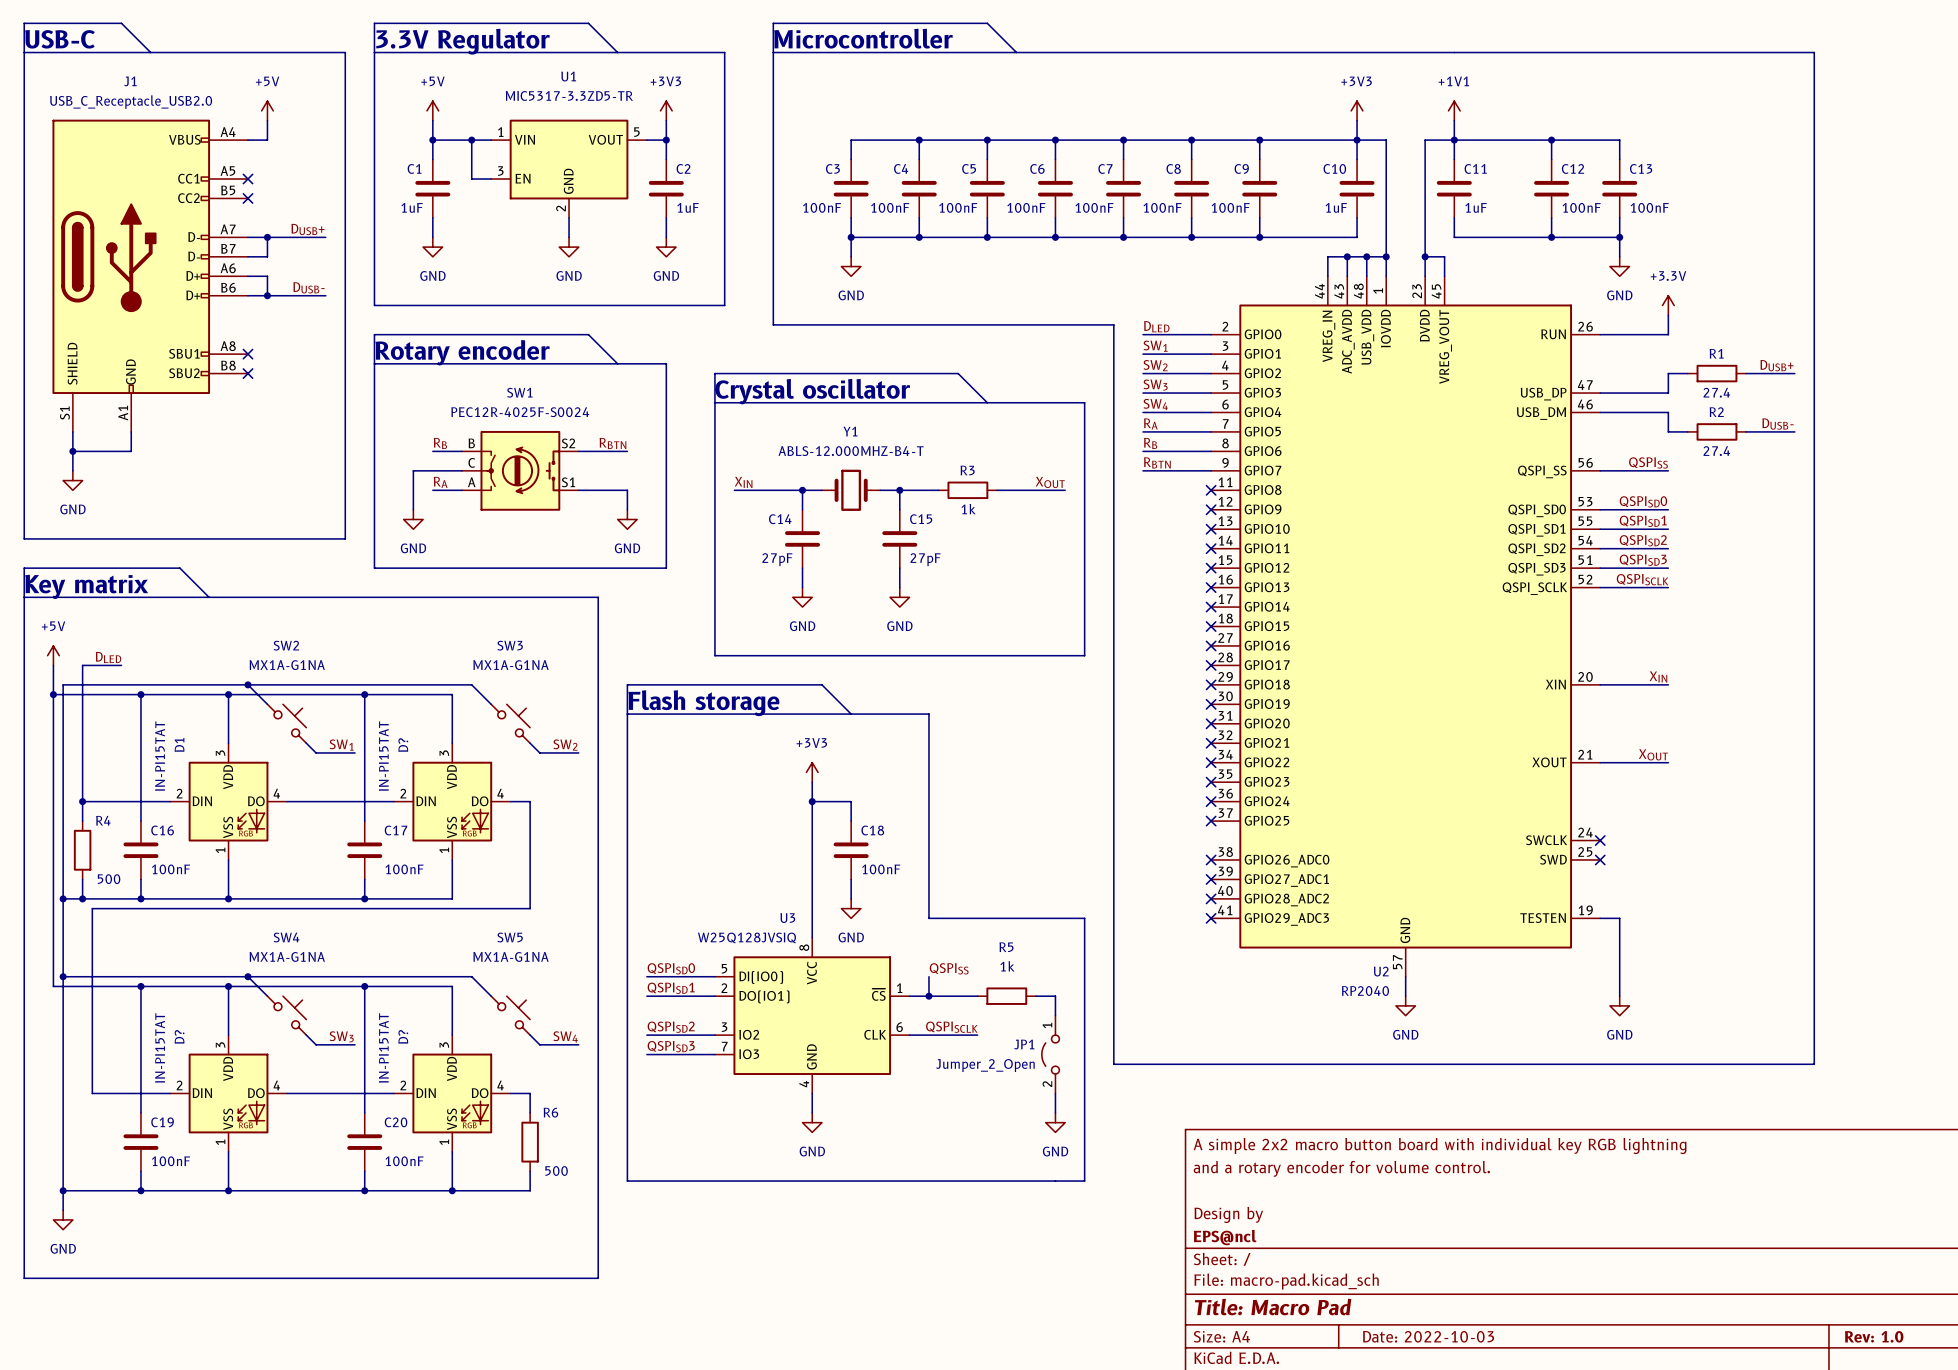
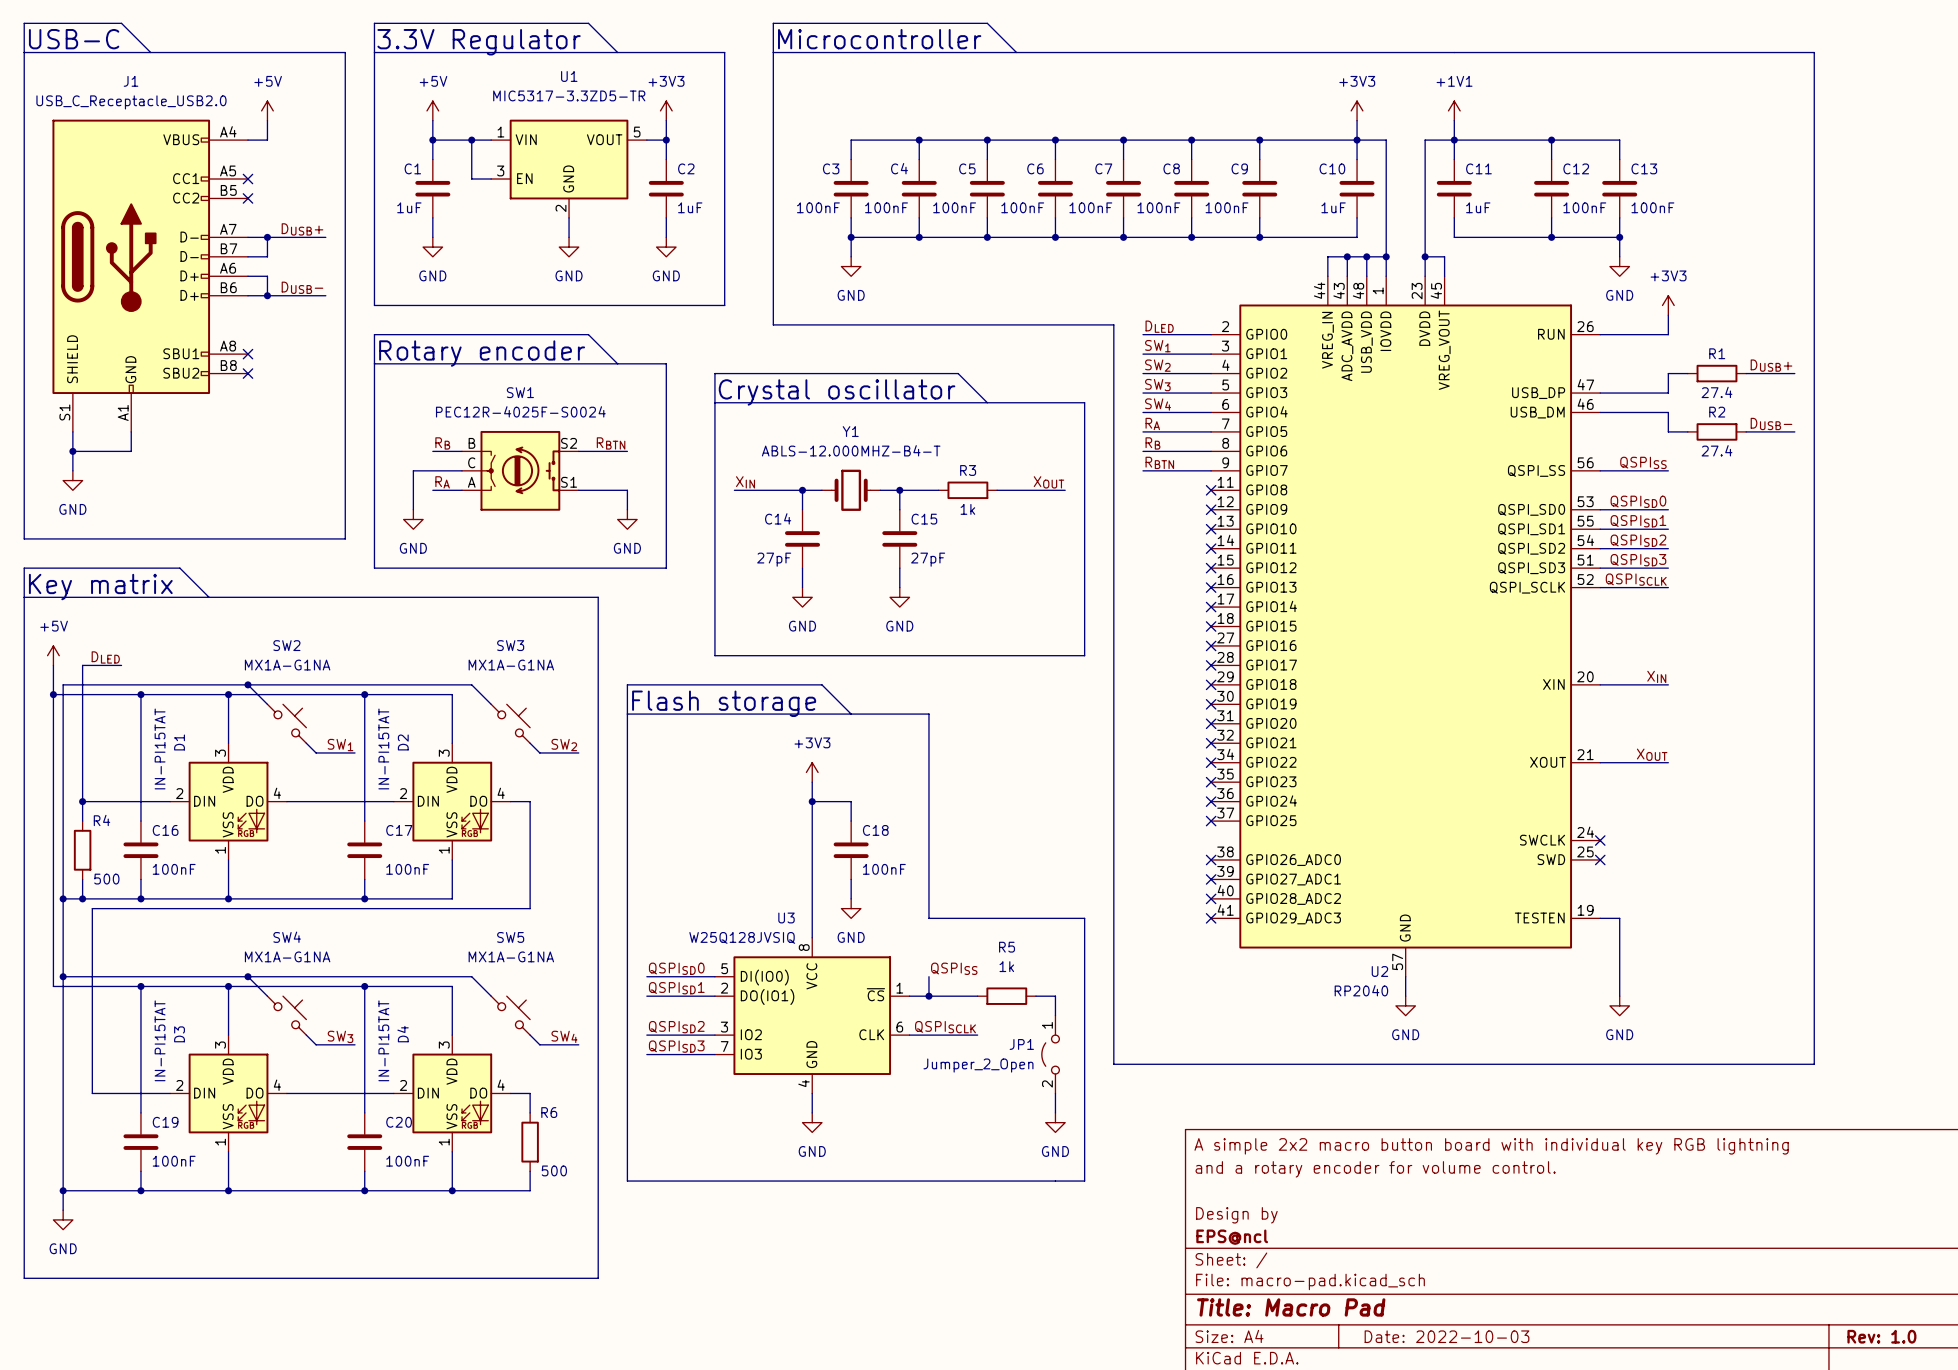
power symbol: +3.3V (1668, 305) -> +3V3 (1668, 305)
D? name: D? (403, 745) -> D2 (403, 742)
D? name: D? (179, 1036) -> D3 (179, 1034)
D? name: D? (403, 1036) -> D4 (403, 1034)

